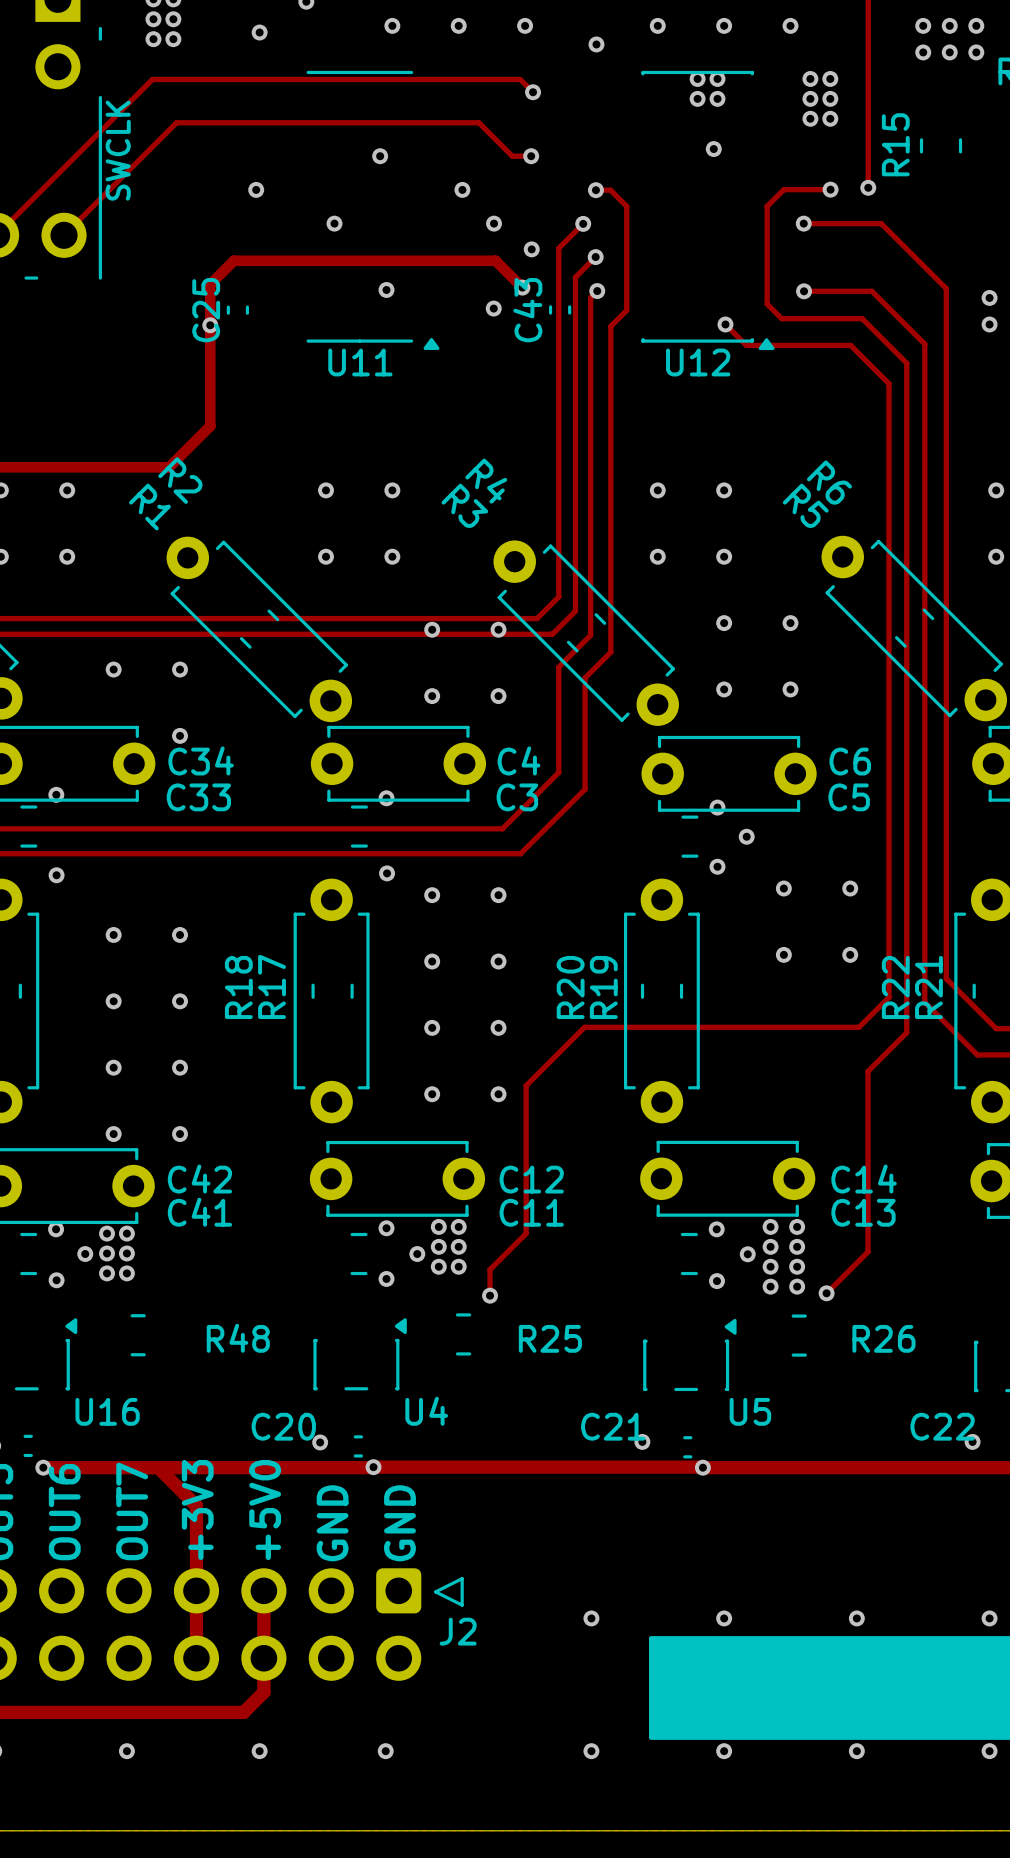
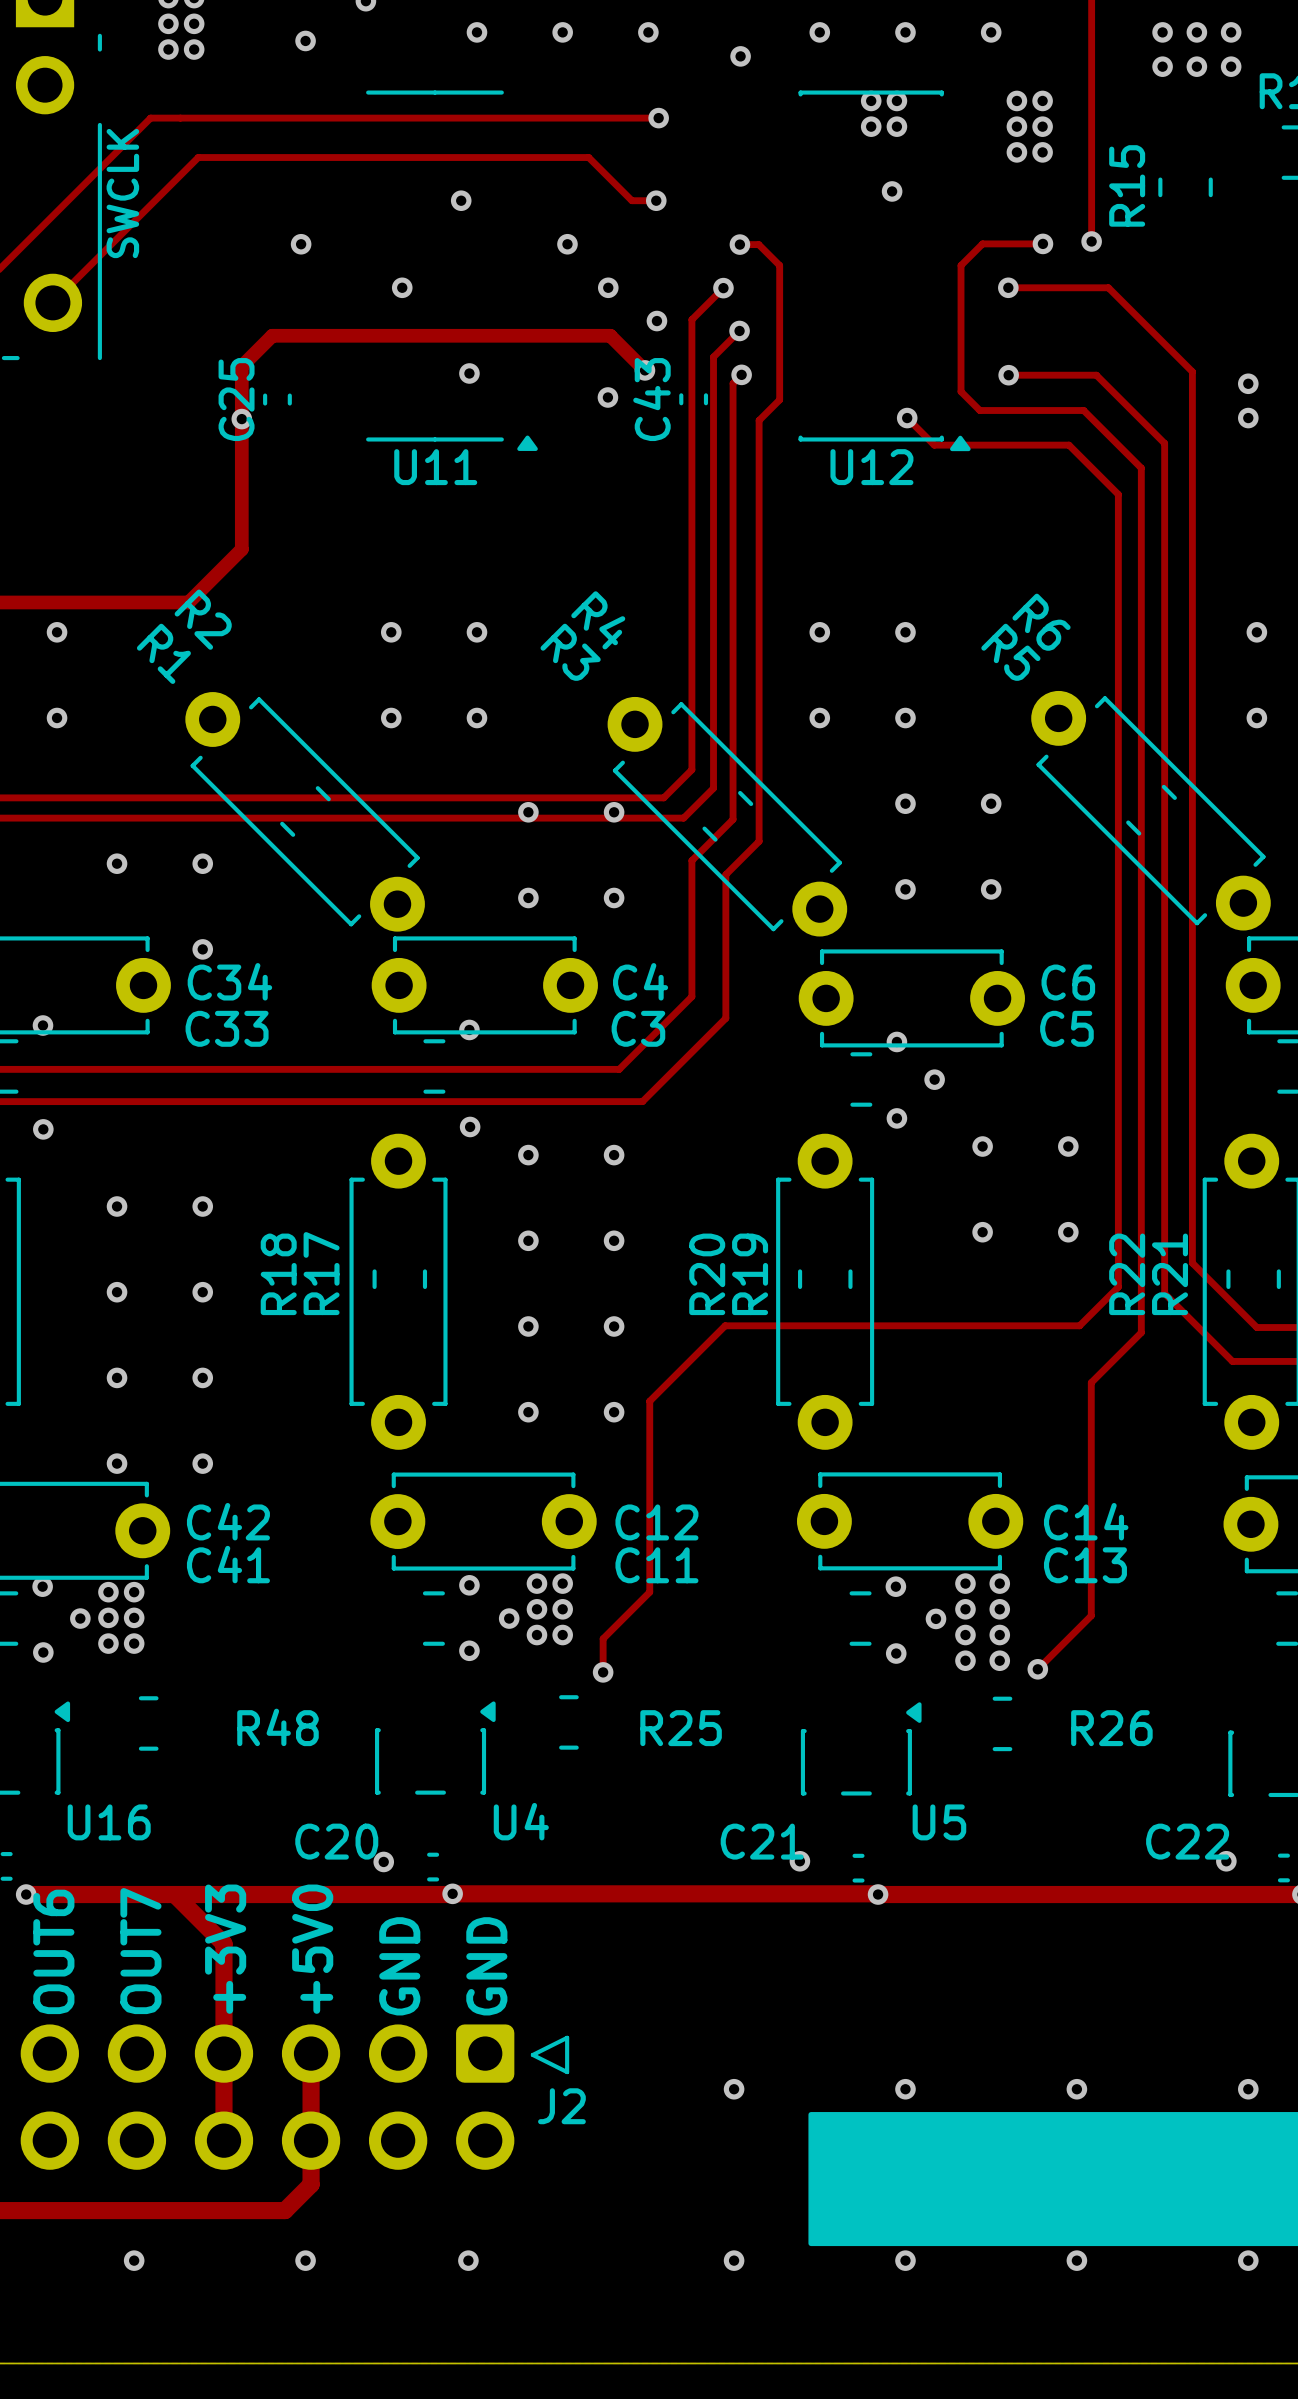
track: (139, 92) (152, 79) (520, 79) (533, 92) -> (150, 118) (658, 118)

